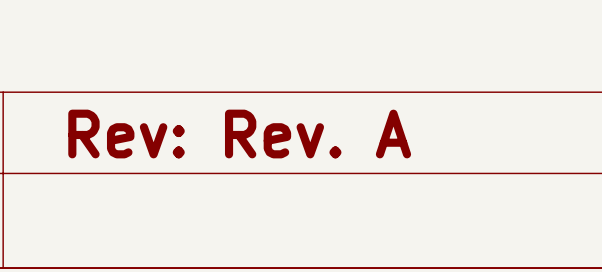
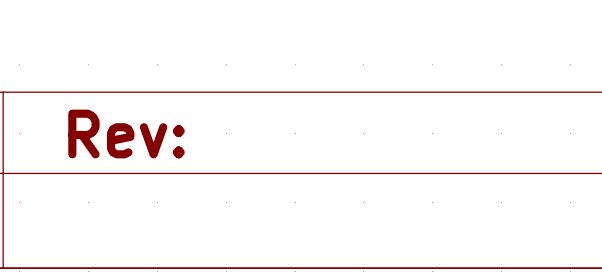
title block: Rev: Rev. A (239, 134) -> Rev: (126, 134)

